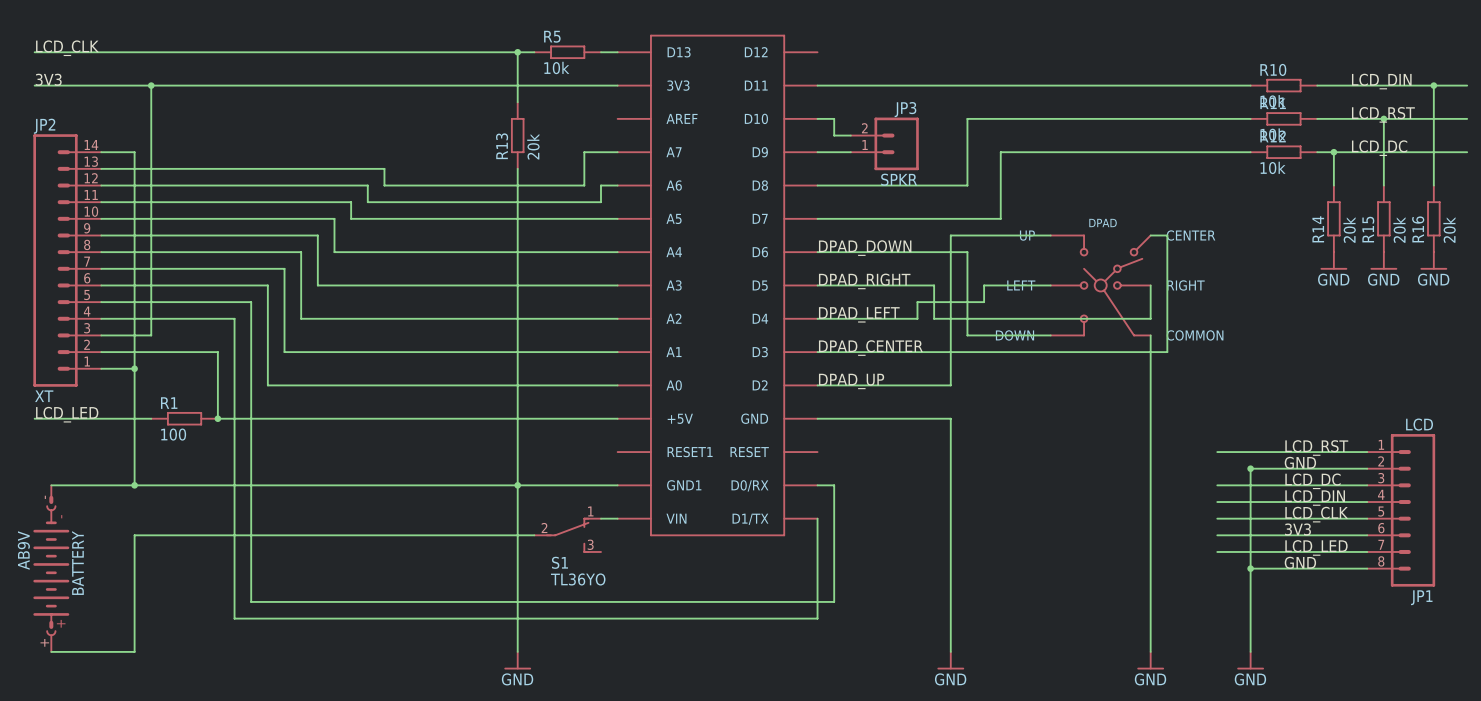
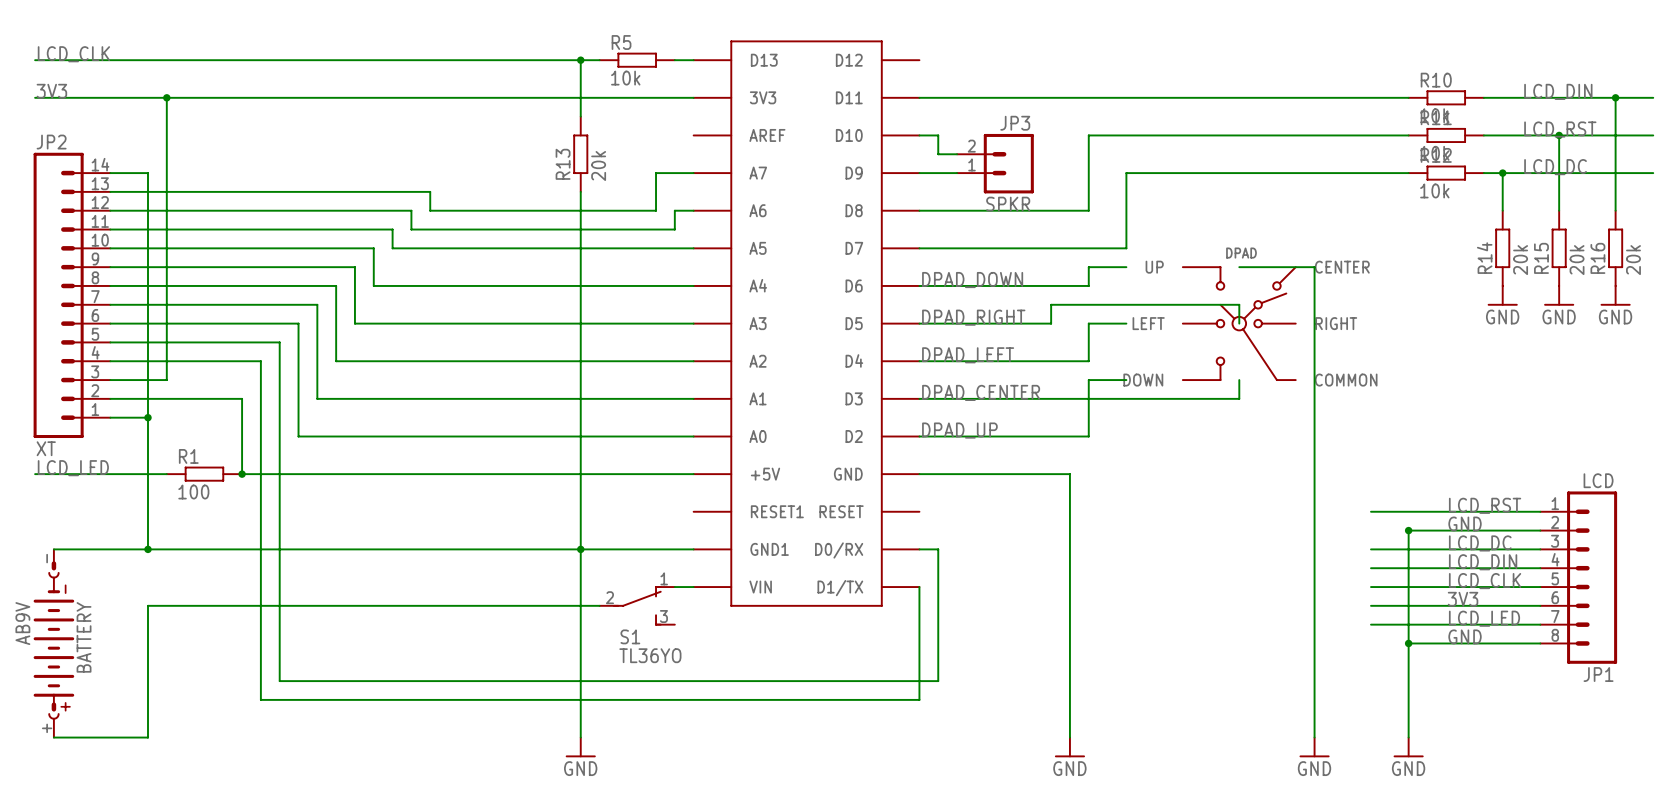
wire: (967, 235) (950, 235) (950, 385) -> (1088, 380) (1088, 436) (1069, 436)
wire: none -> (1088, 267) (1088, 285)
wire: (1000, 235) (1050, 235) -> (1239, 267) (1295, 267)
wire: (967, 252) (967, 285) -> (1107, 323) (1088, 323)
wire: (934, 285) (934, 318) -> (1032, 361) (1051, 361)
wire: none -> (1051, 323) (1051, 304) (1239, 304) (1239, 323)
wire: (984, 285) (984, 302) (917, 302) (917, 318) -> none
wire: (1000, 285) (1050, 285) -> none
wire: (1150, 285) (1150, 318) (967, 318) (967, 335) -> none
wire: (1000, 335) (1050, 335) -> none
wire: (1150, 335) (1150, 651) -> none
wire: (1100, 352) (1167, 352) -> (1239, 398) (1239, 380)
wire: none -> (1314, 398) (1314, 737)
power symbol position: GND (1150, 660) -> GND (1314, 747)

